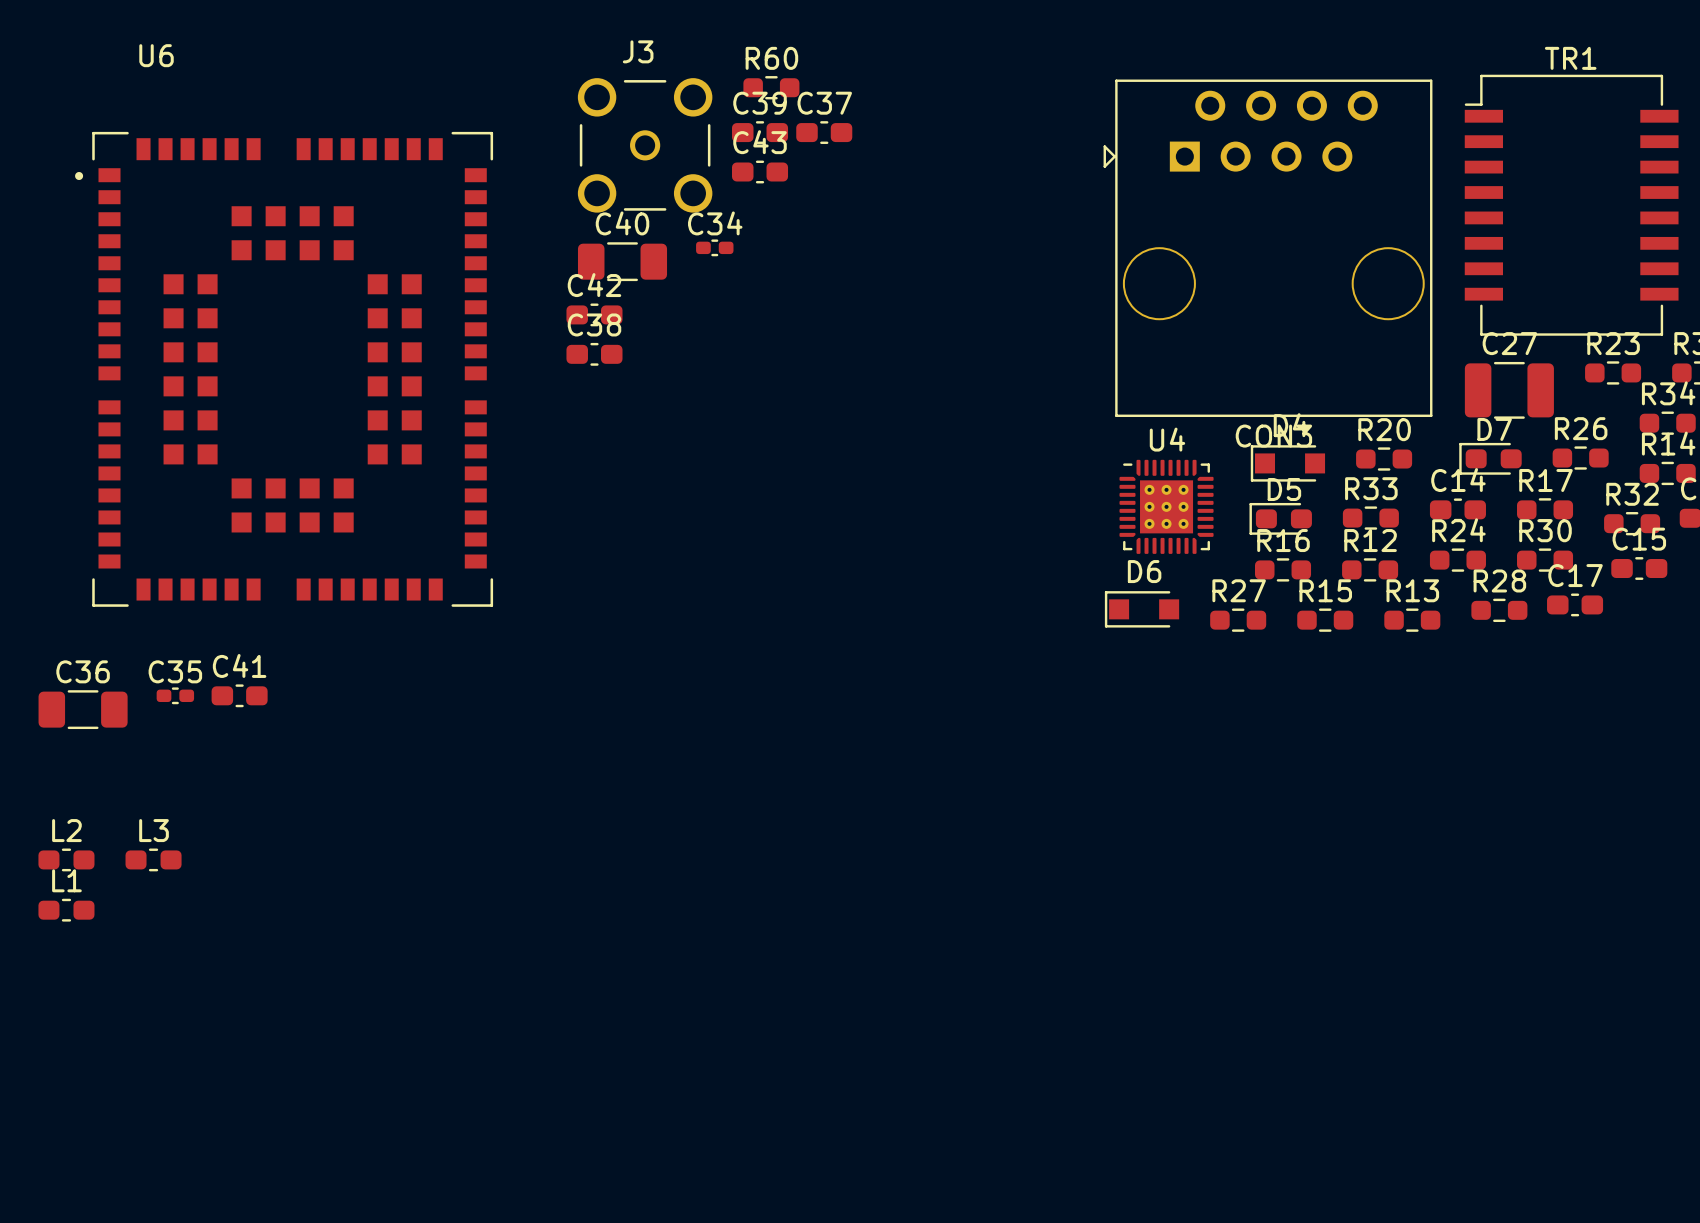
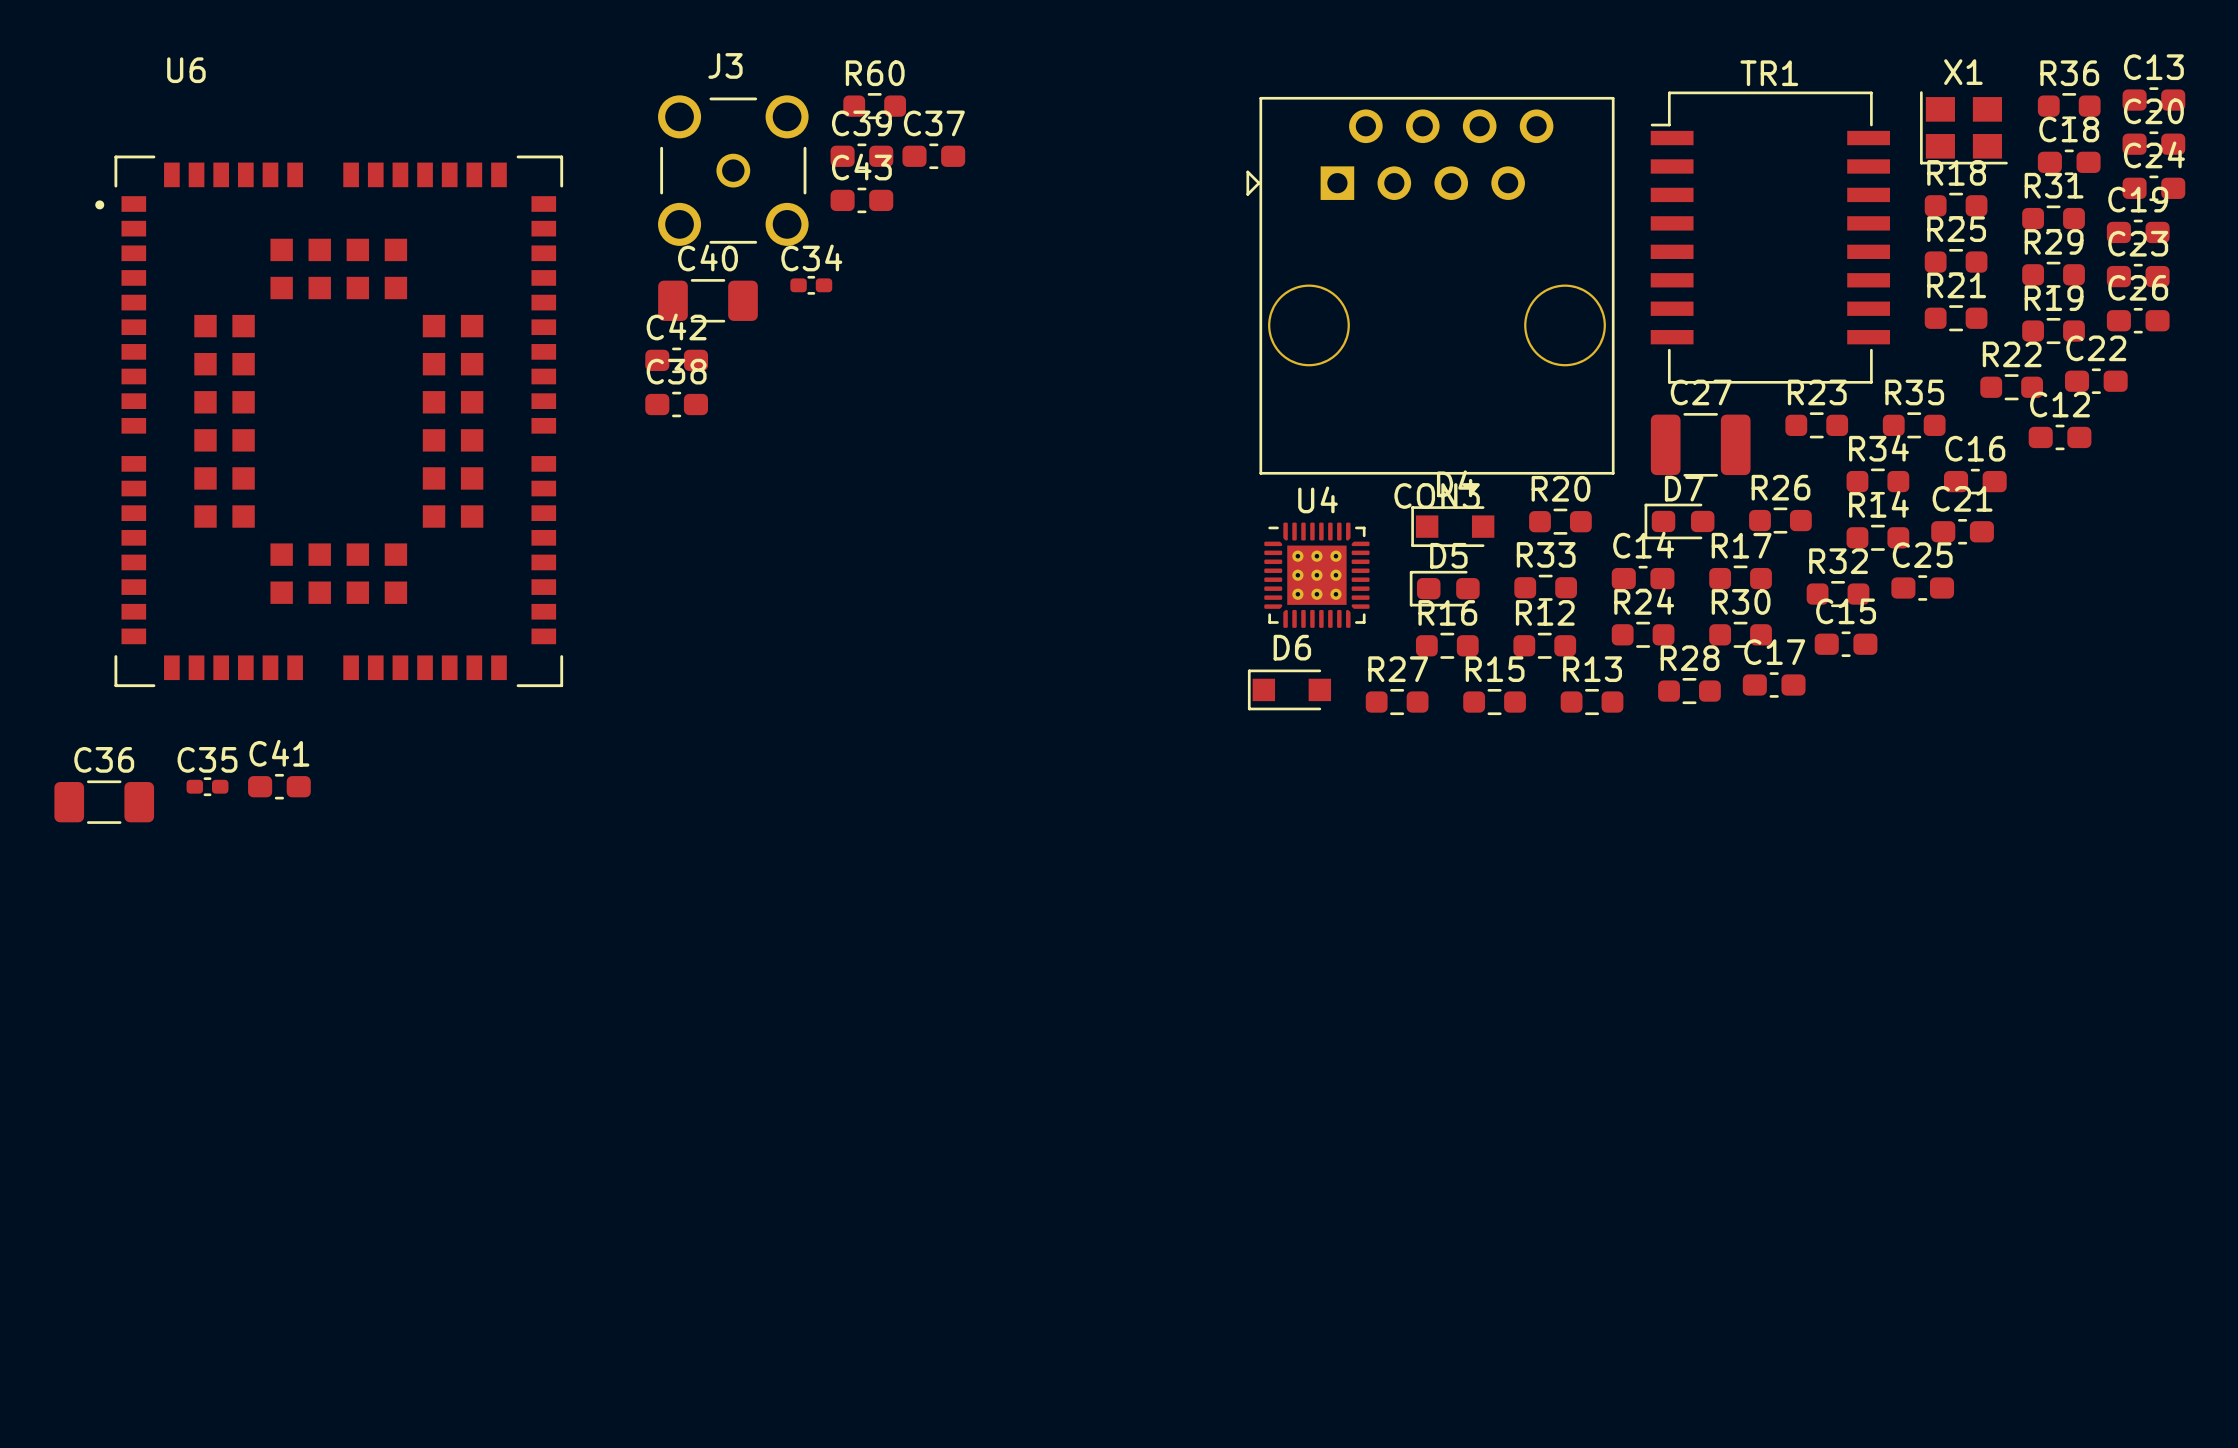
L2: (66, 859) -> none
L3: (153, 859) -> none
L1: (66, 910) -> none

